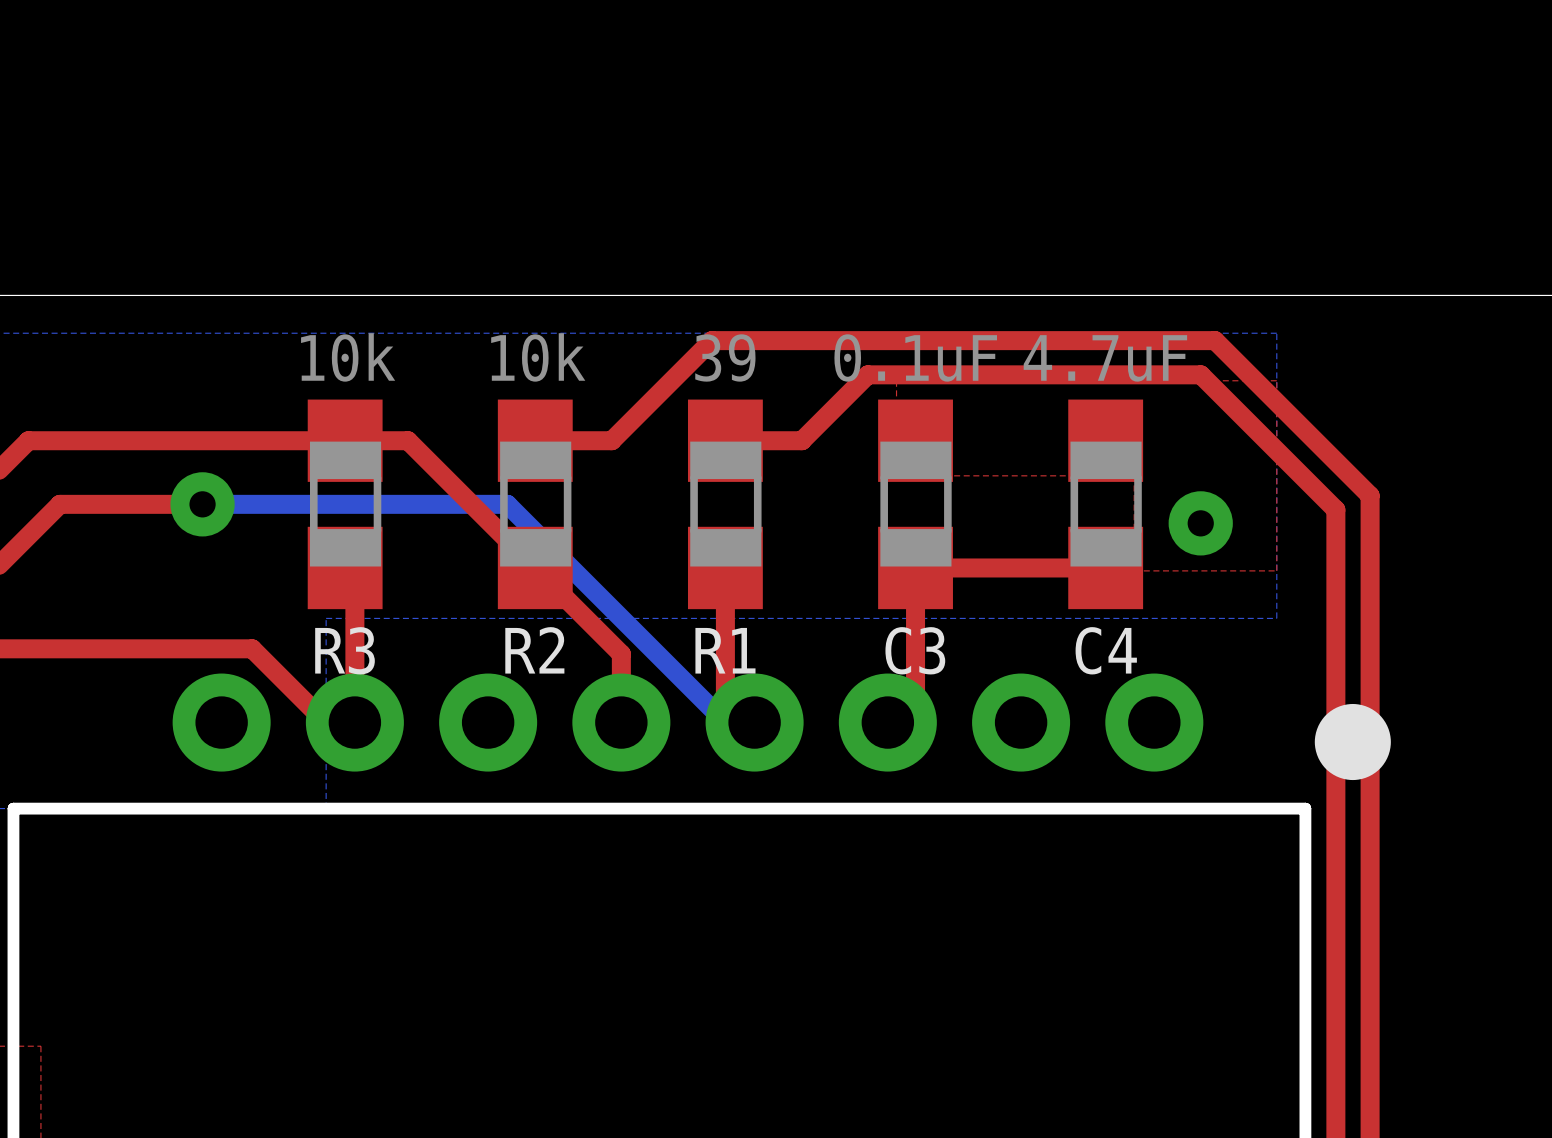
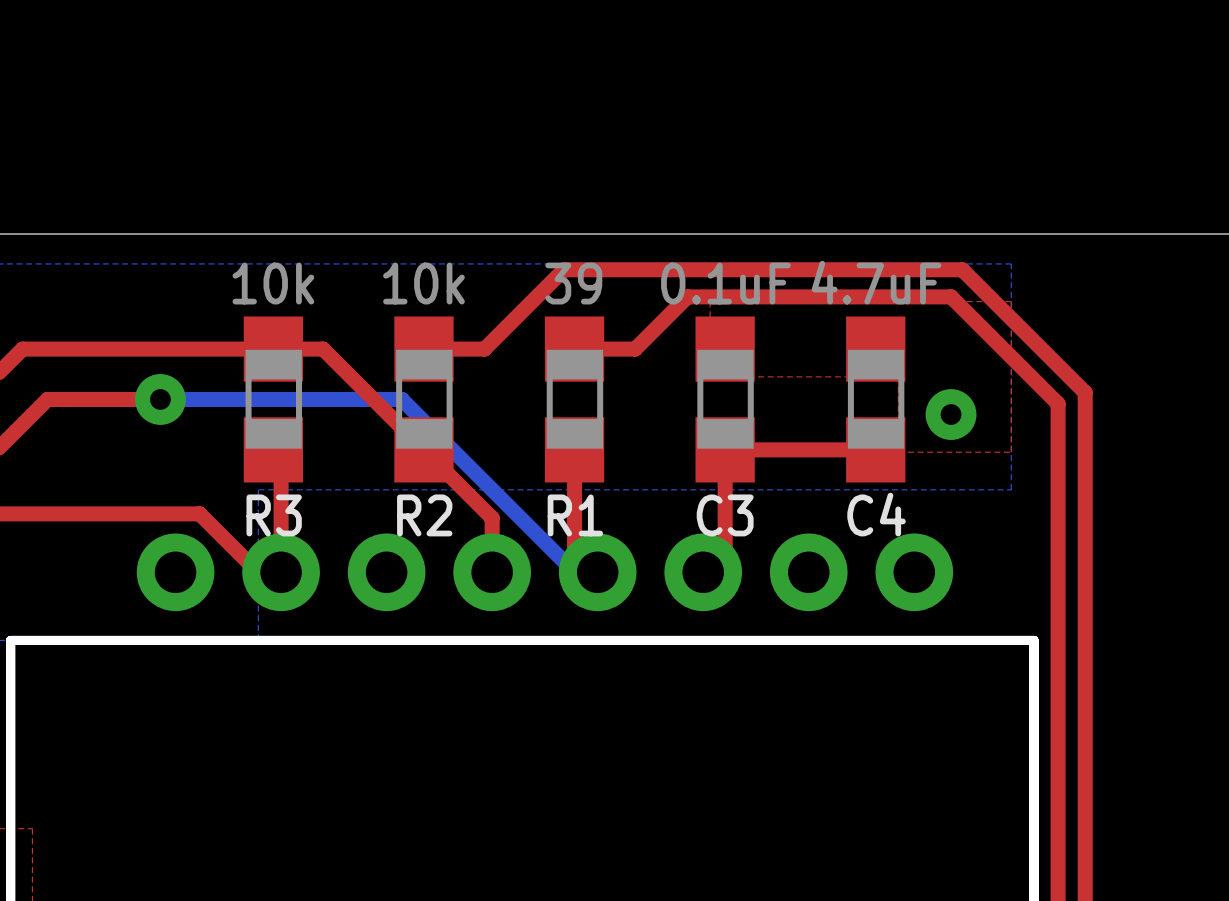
drawing: [1314, 703, 1391, 781] -> none

